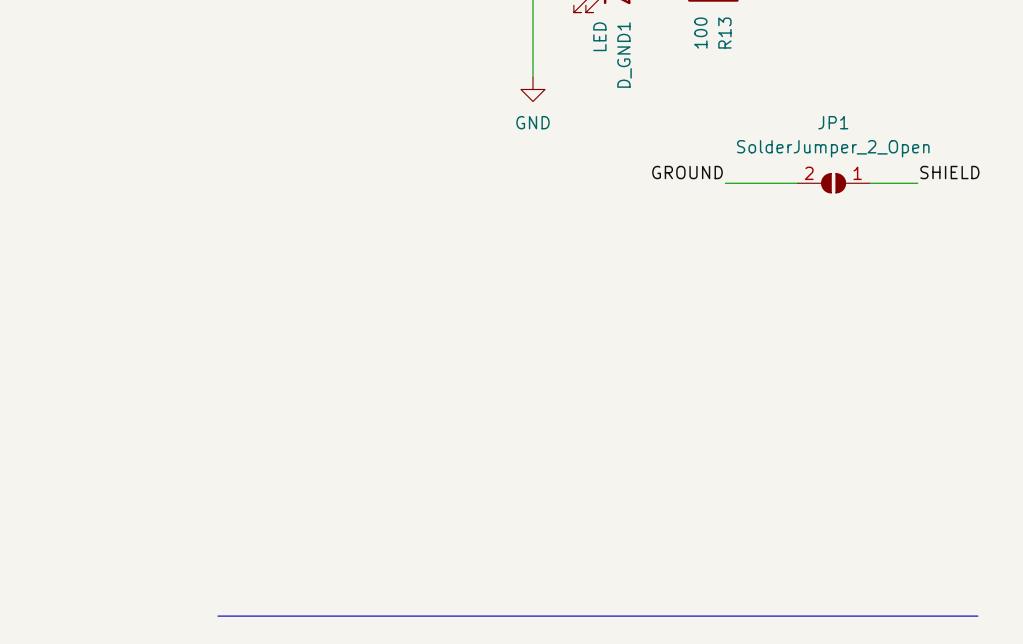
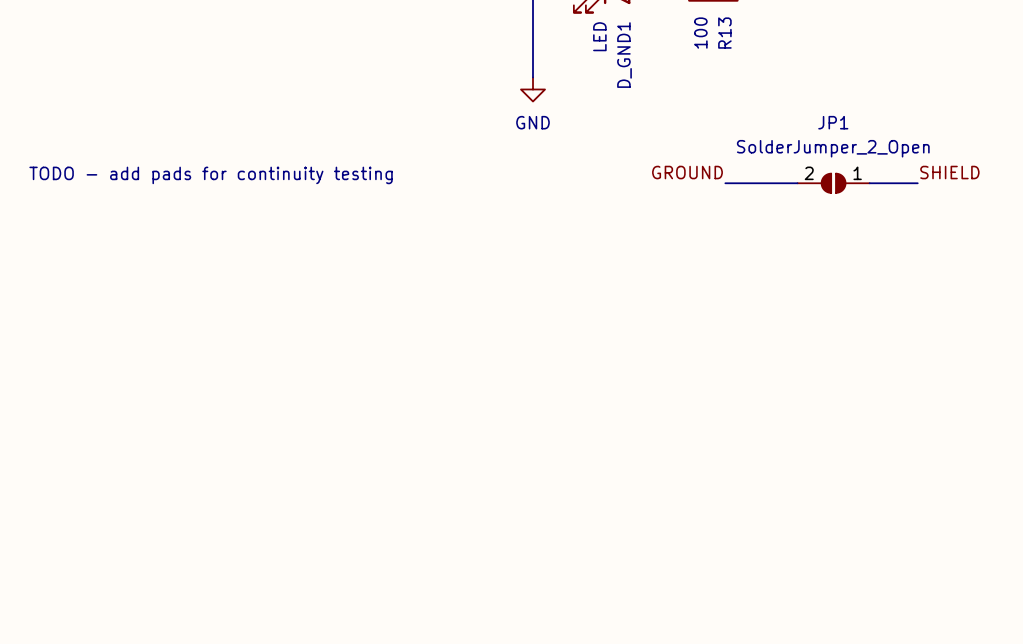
text: none -> TODO - add pads for continuity testing (211, 175)
line: (217, 616) (977, 616) -> none

